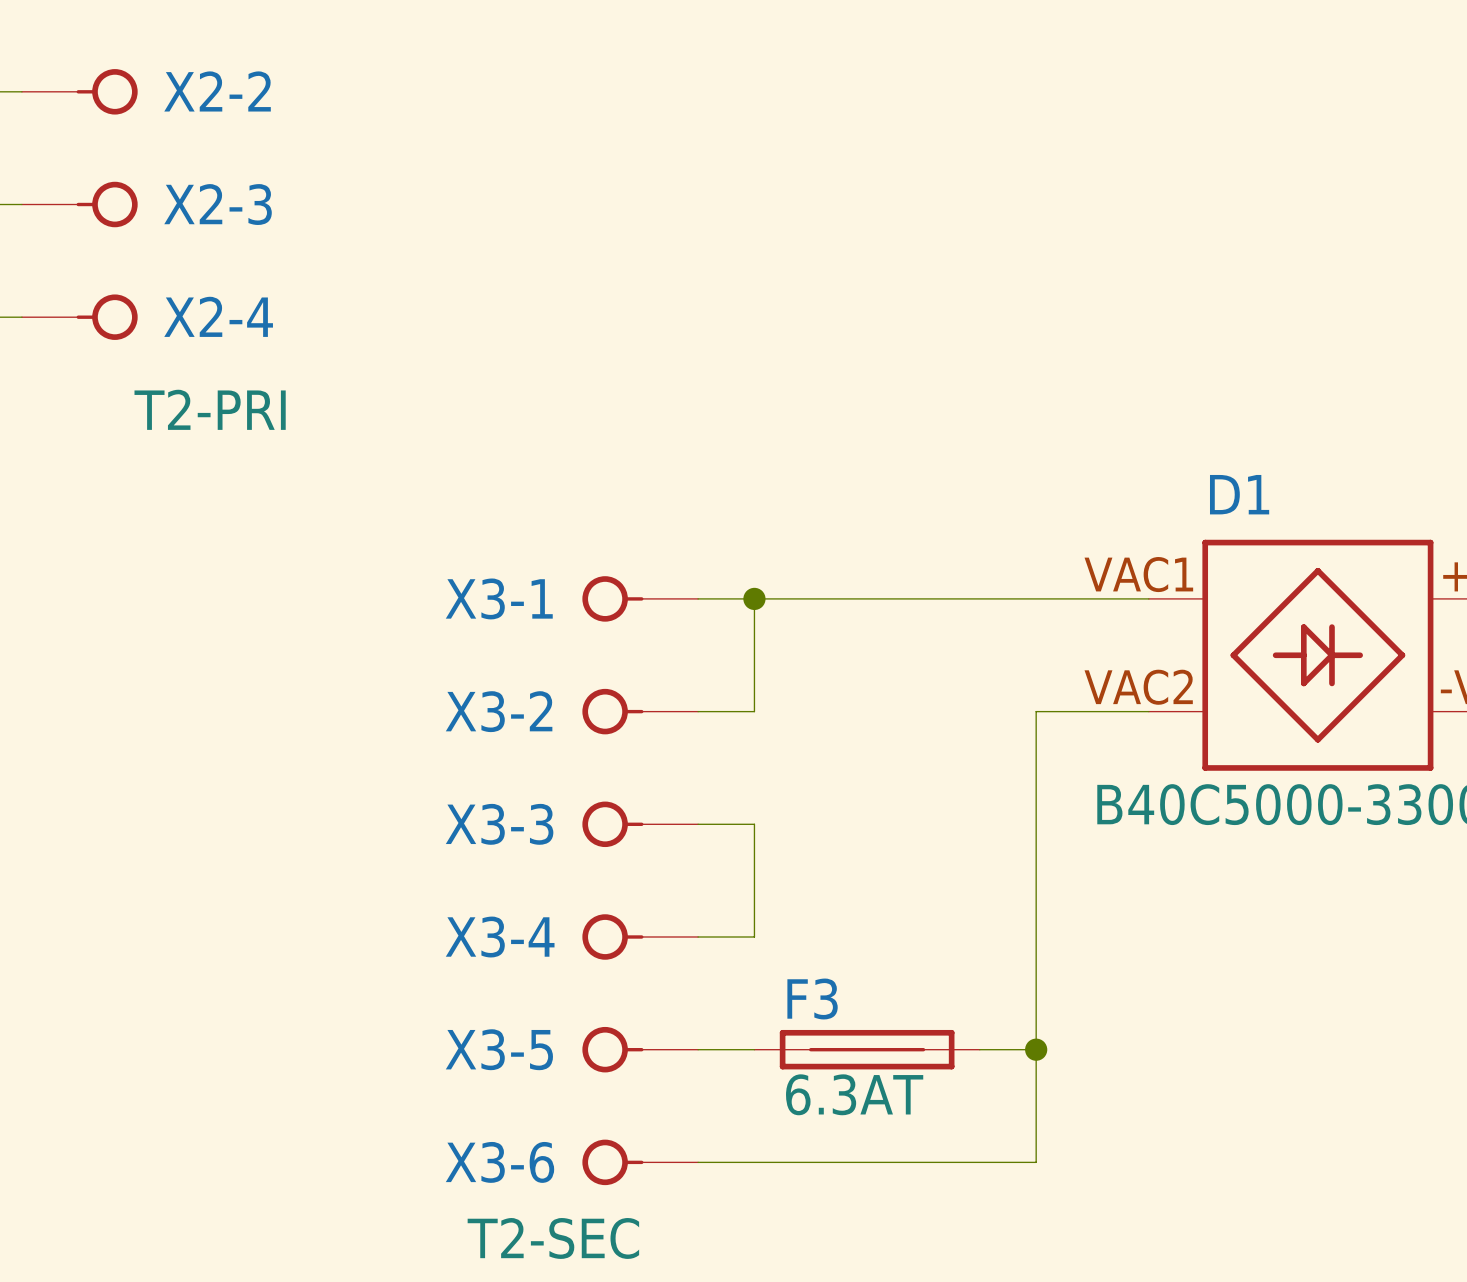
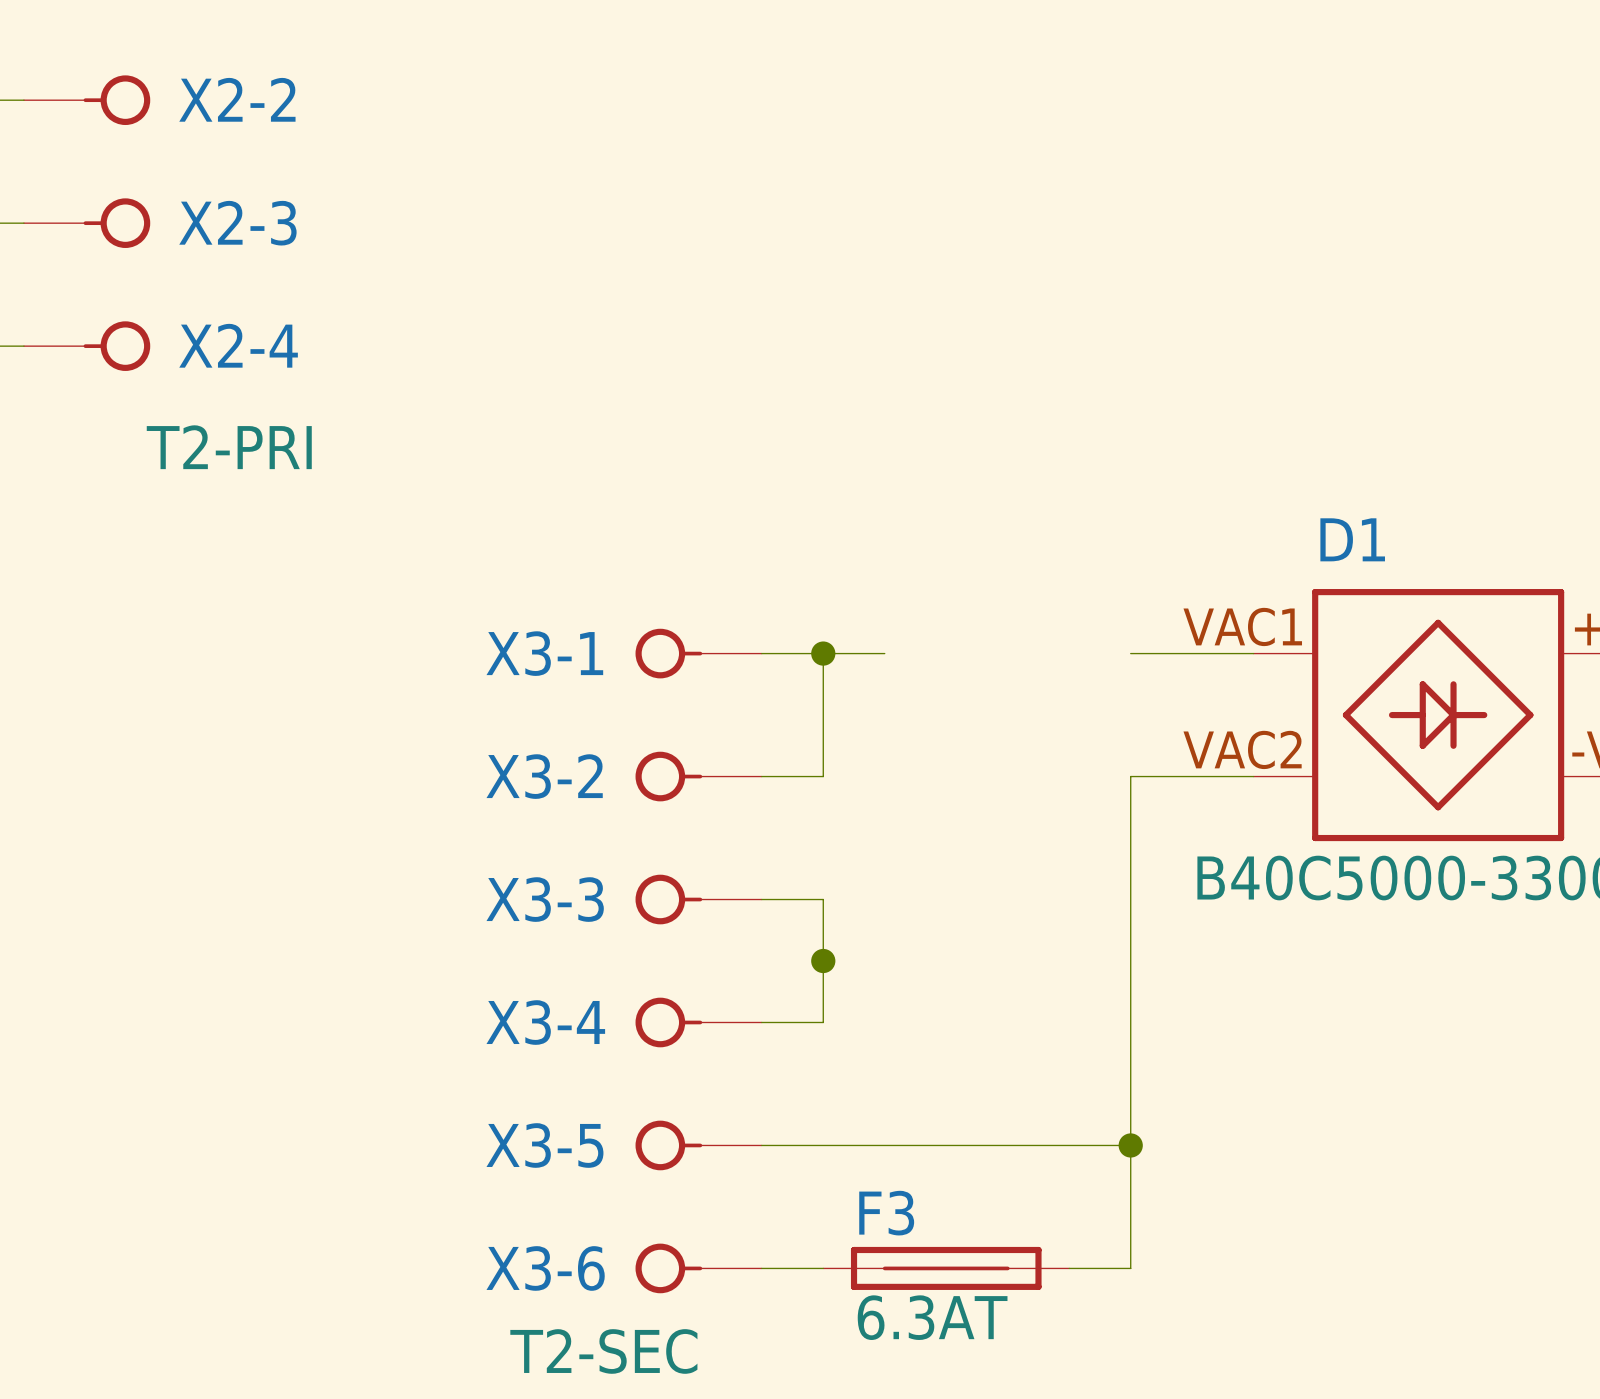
wire: (810, 598) (1036, 598) -> none
junction: none -> (823, 961)
F3 position: (867, 1049) -> (946, 1268)

